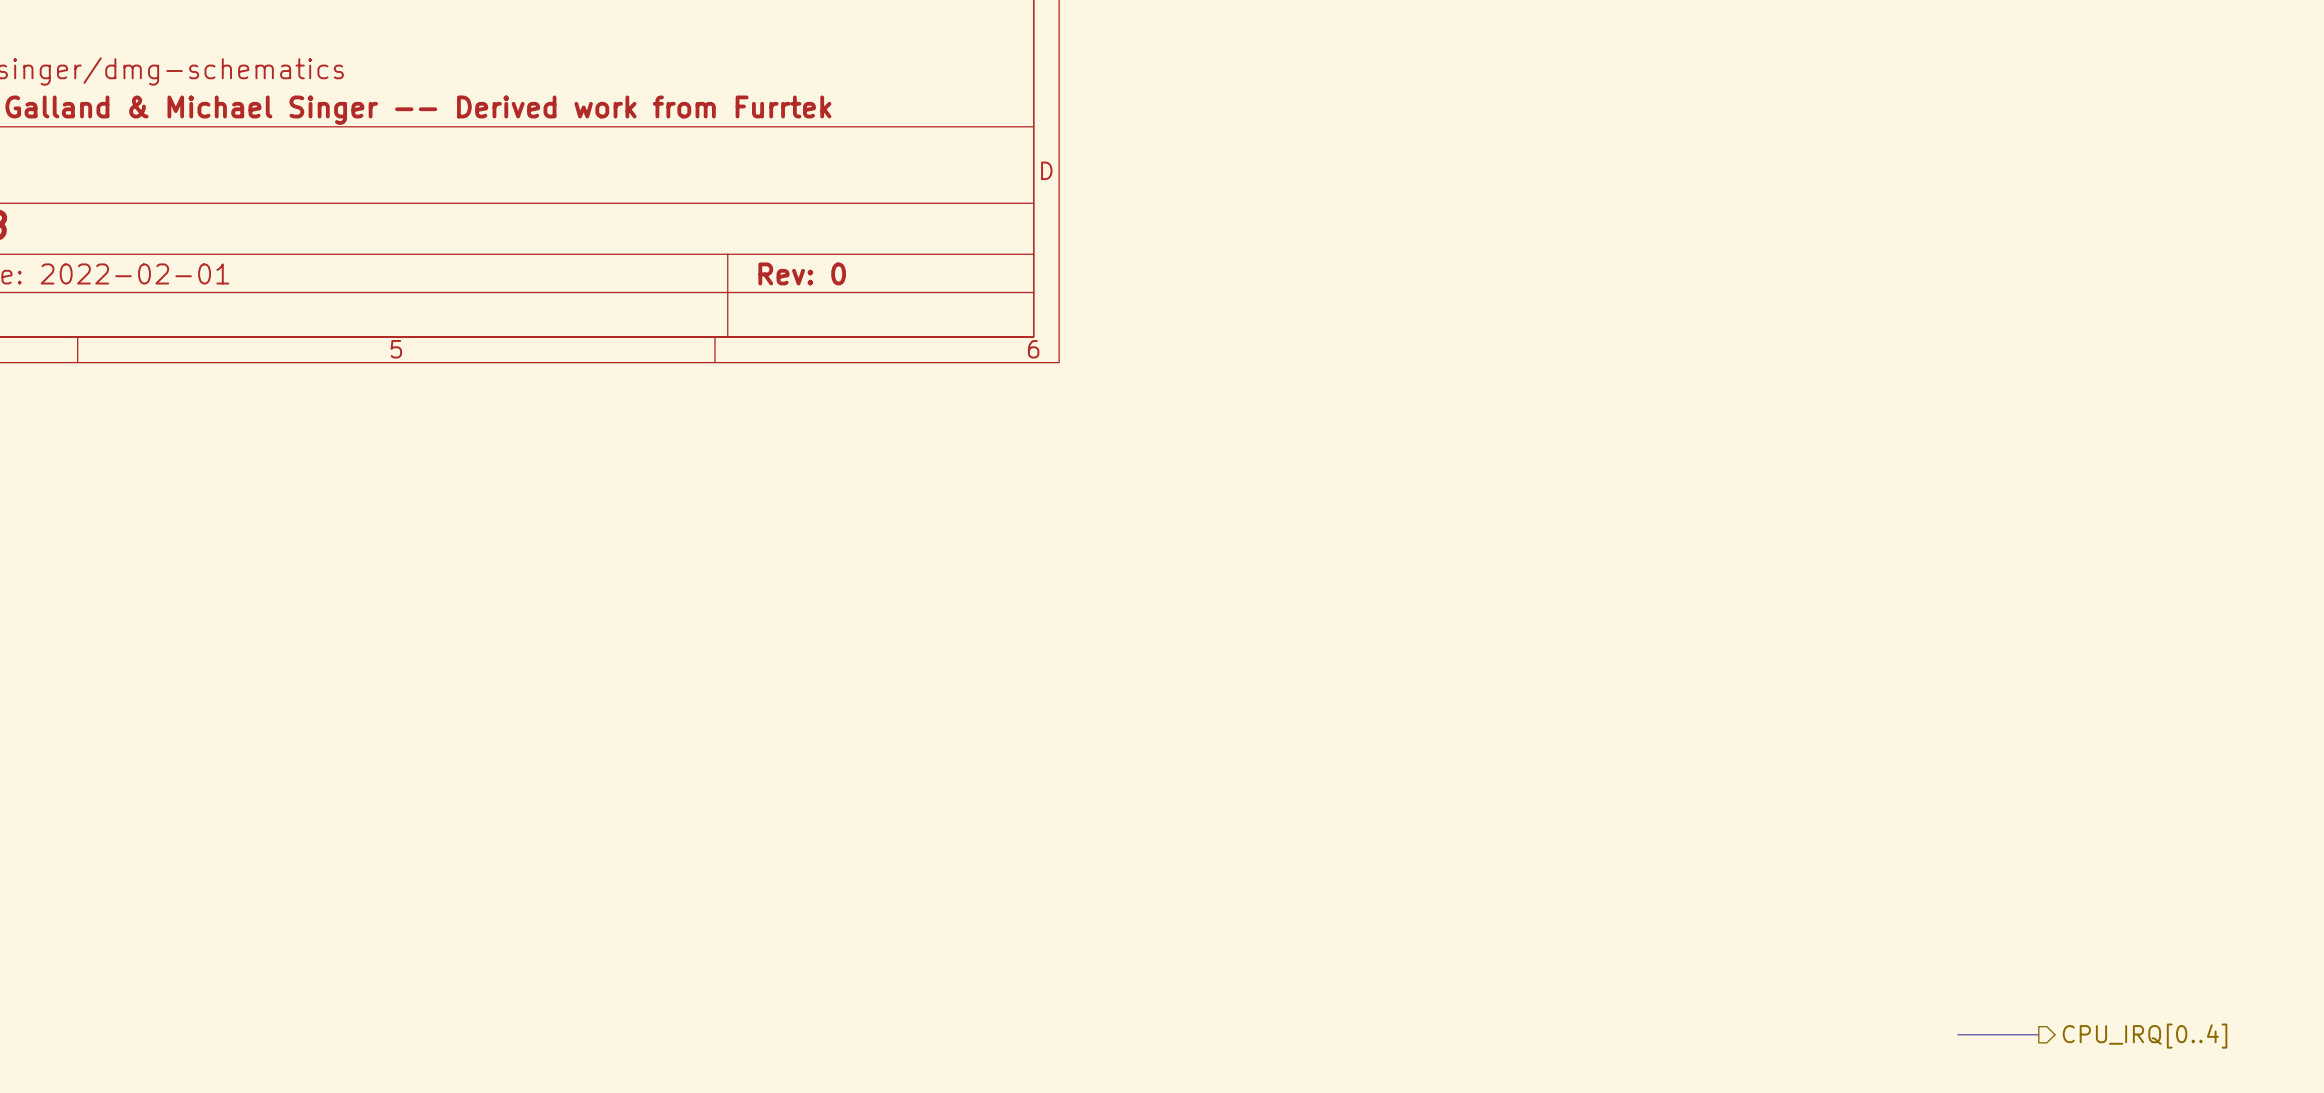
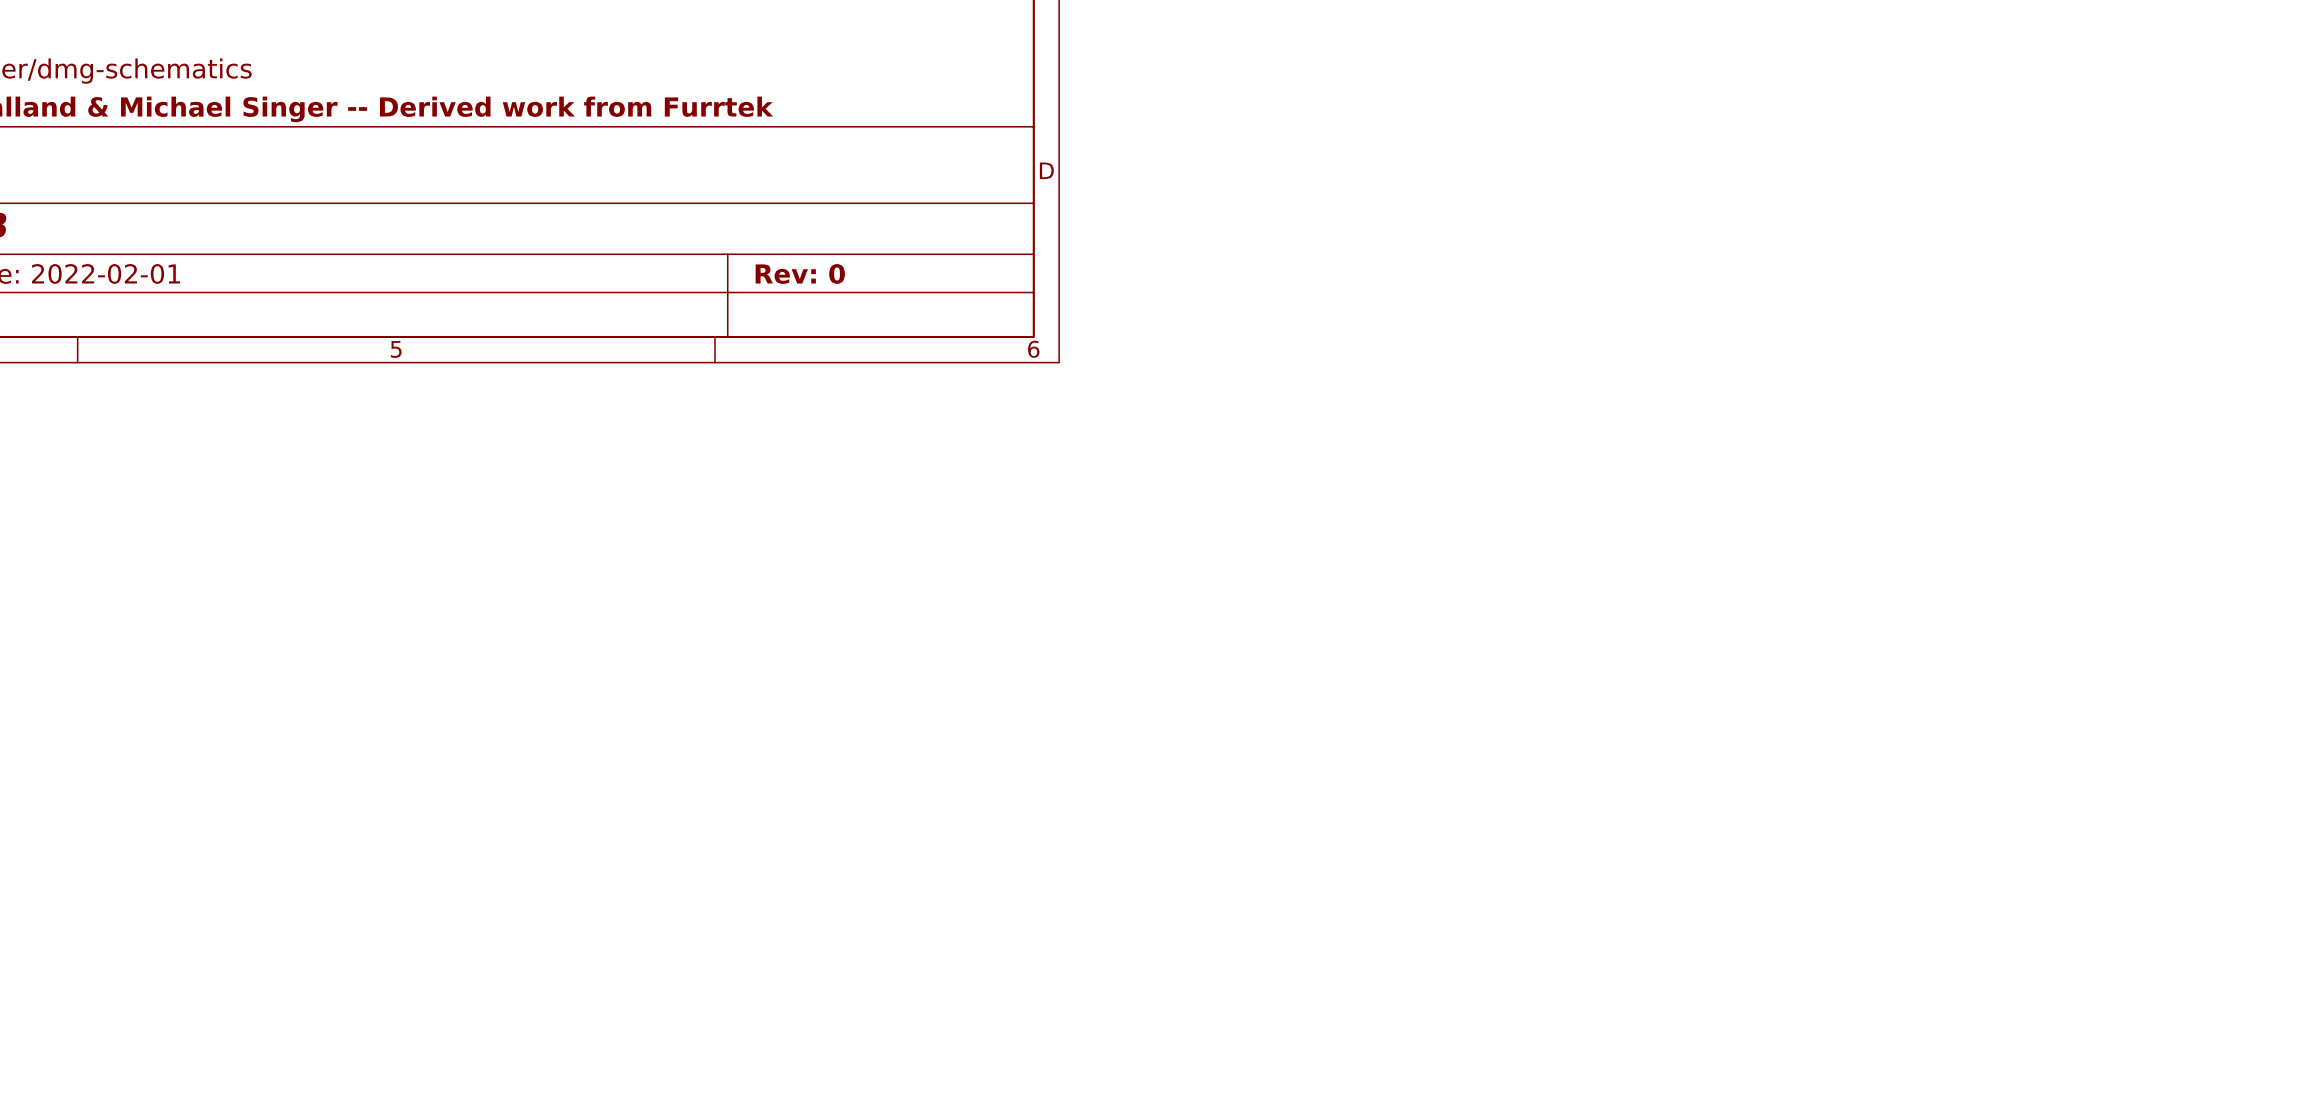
bus: (1957, 1034) (2038, 1034) -> none
hierarchical label: CPU_IRQ[0..4] (2145, 1036) -> none

